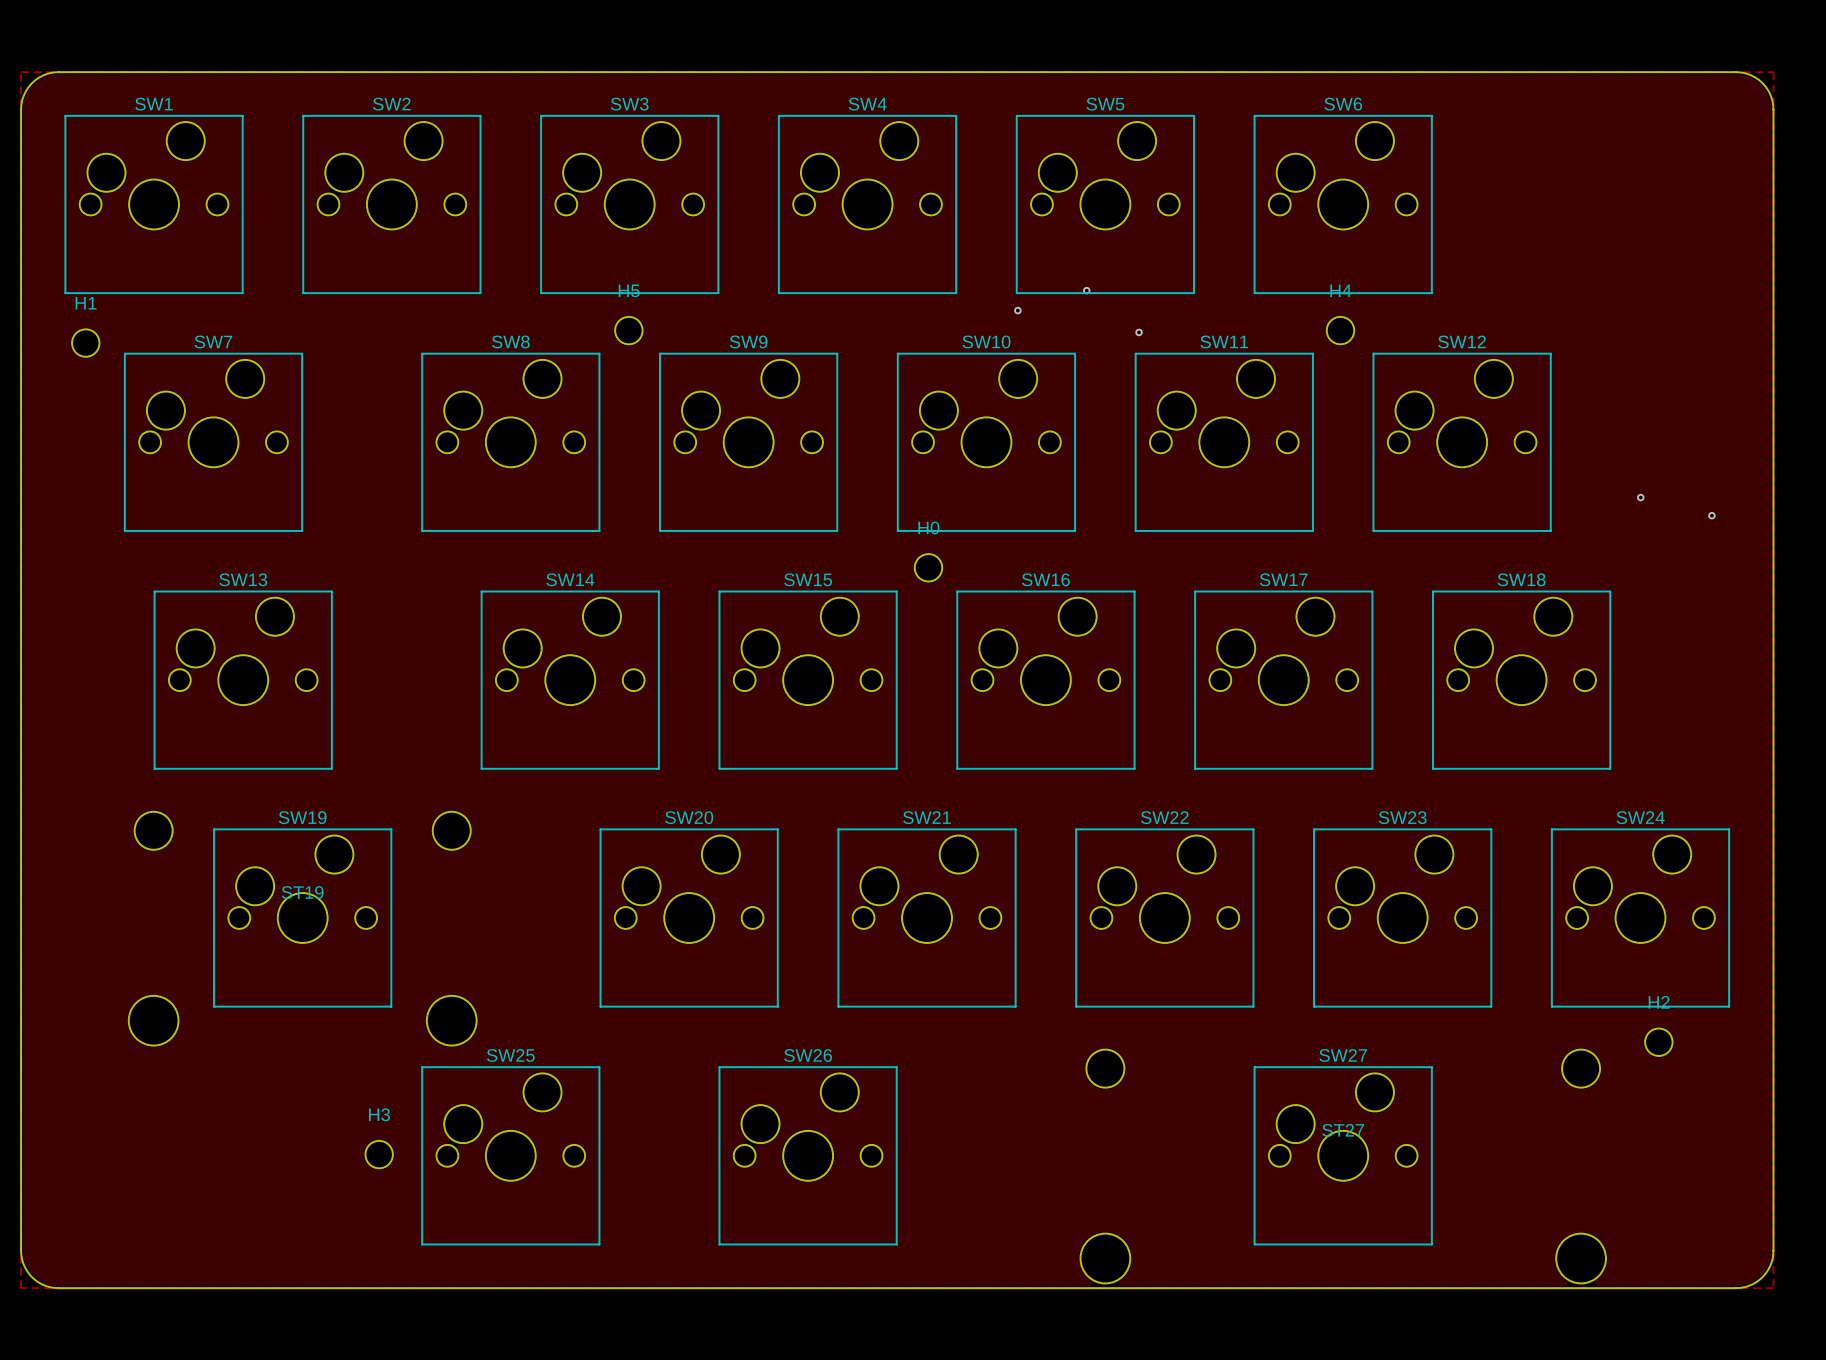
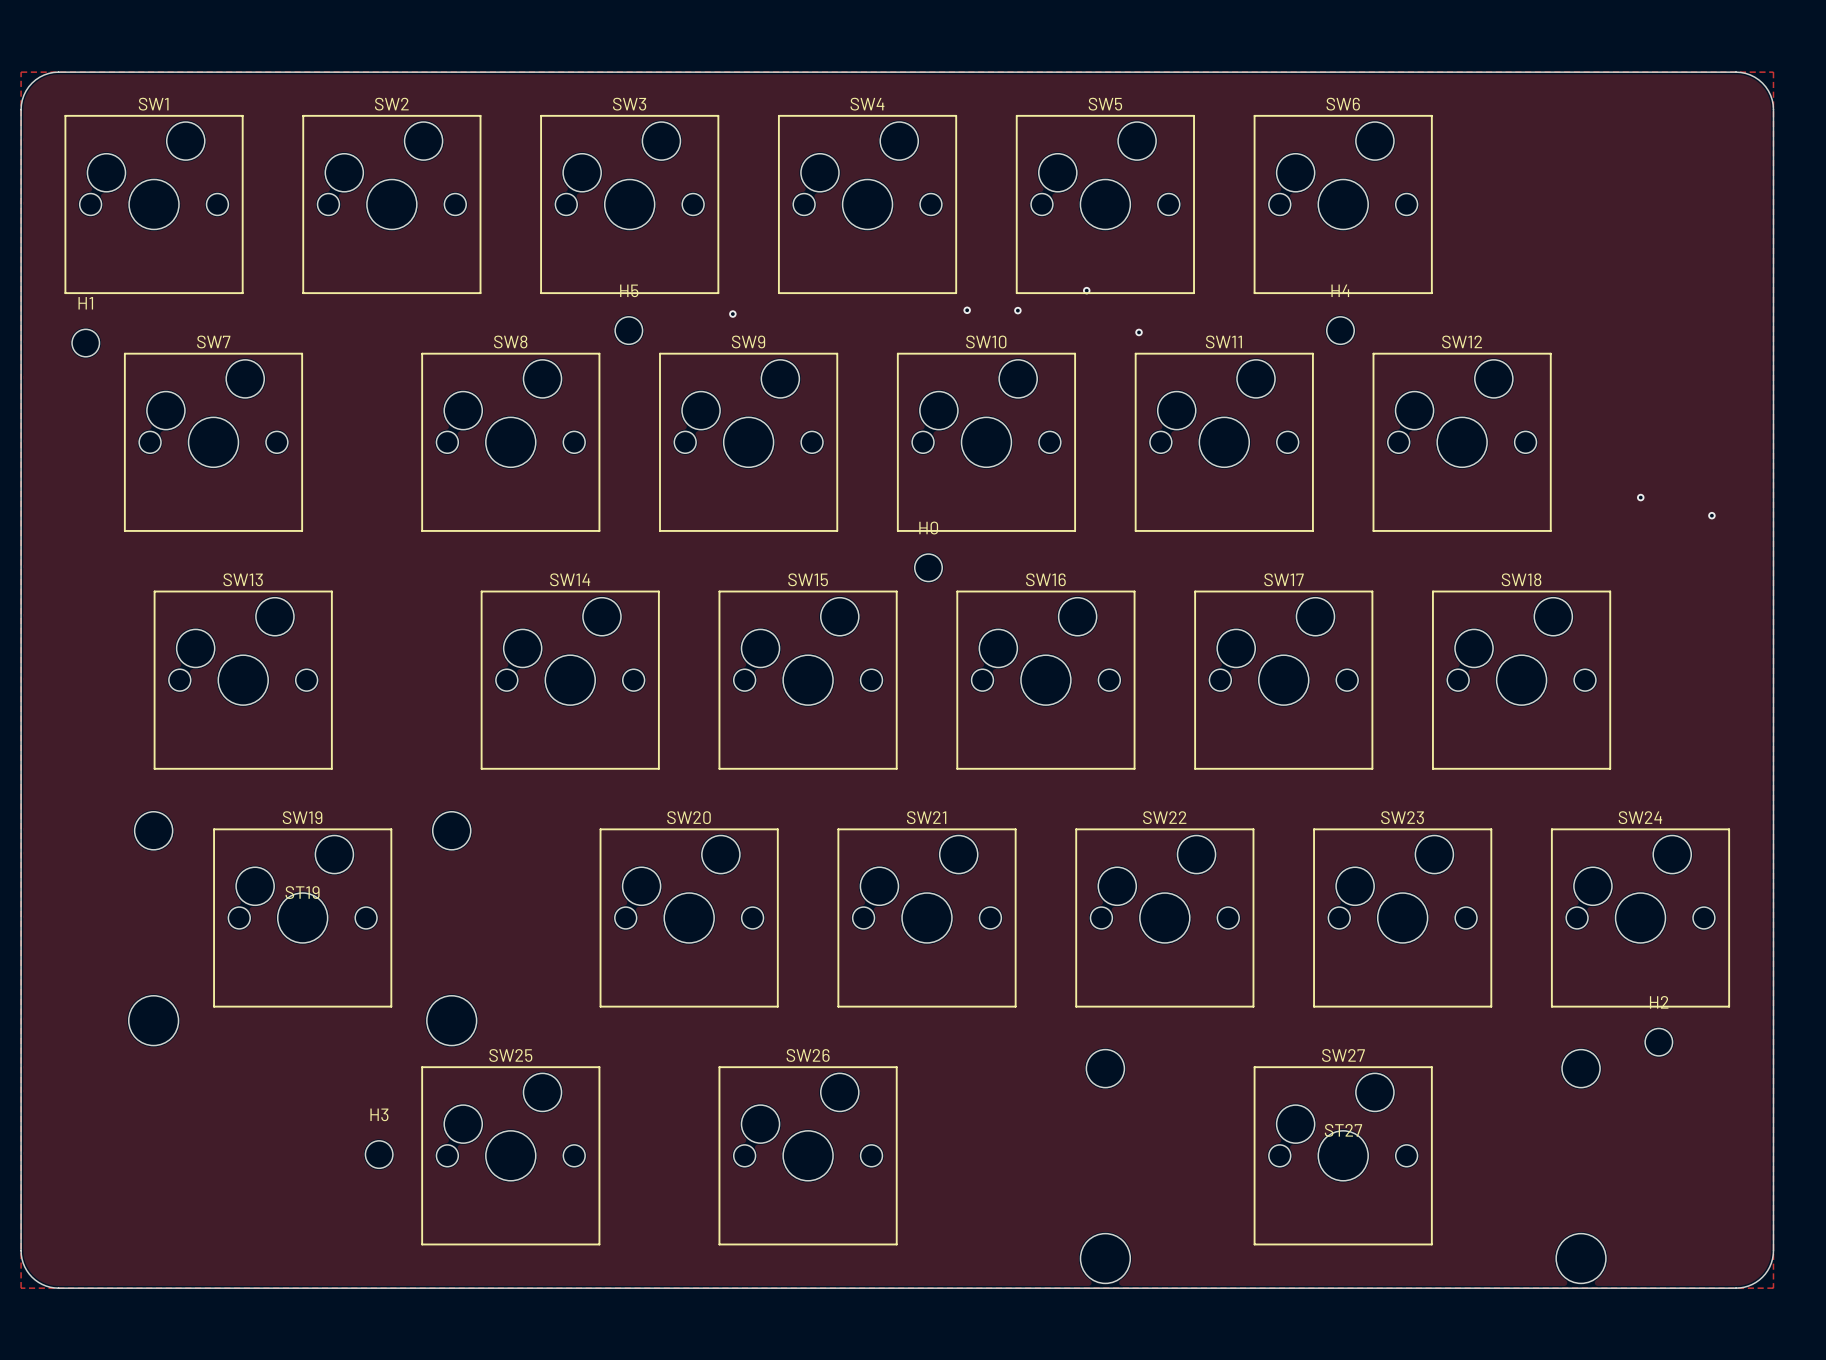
via: none -> (967, 310)
via: none -> (732, 314)

